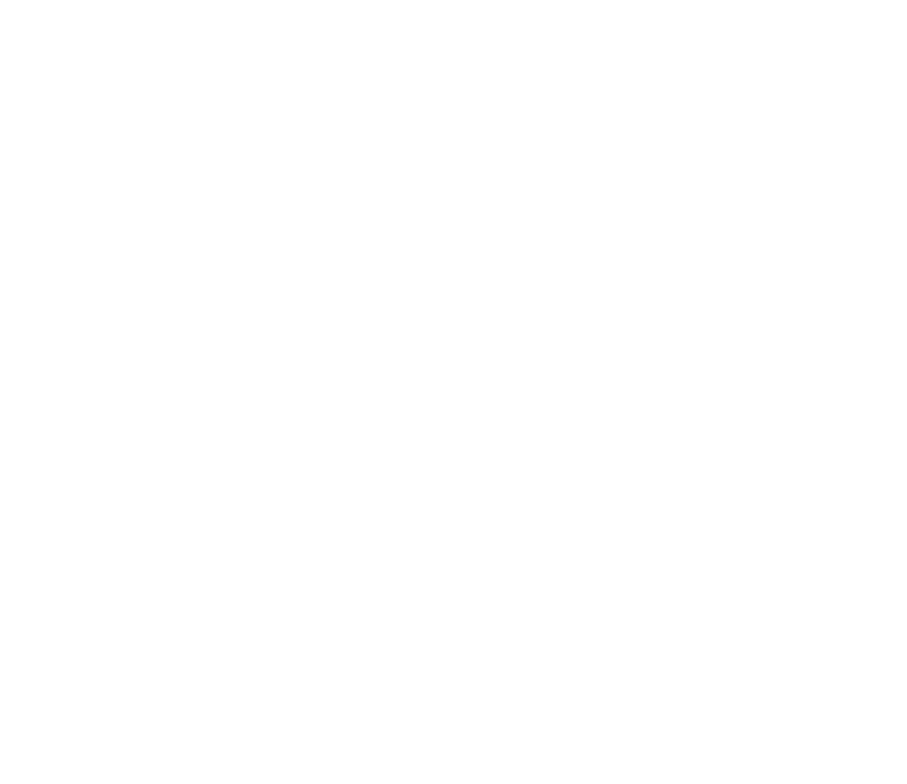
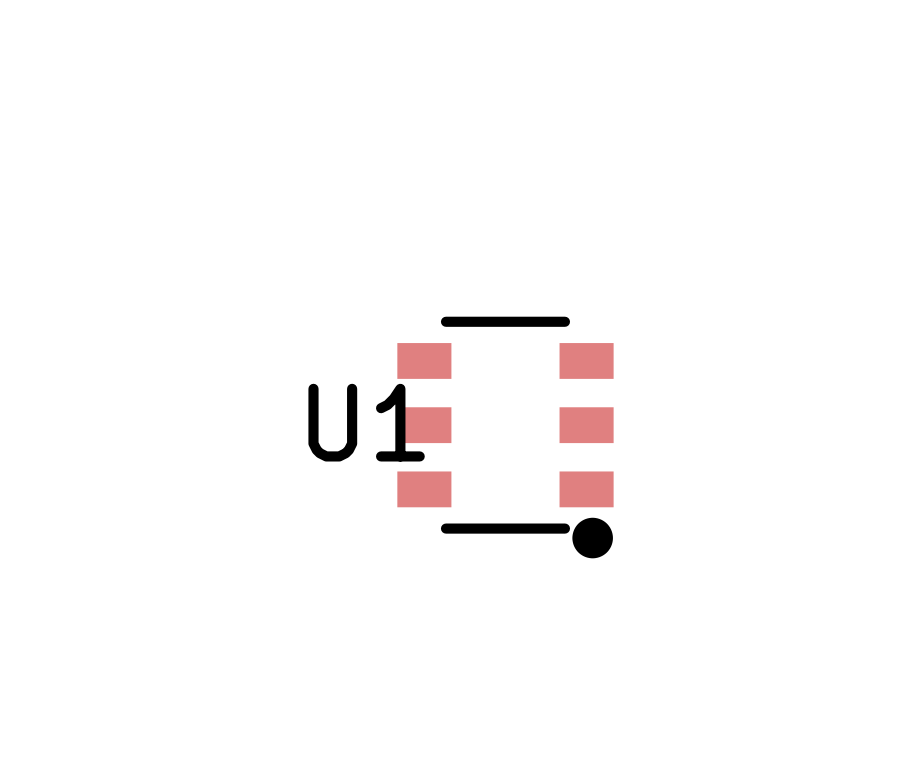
U1: none -> (505, 437)

